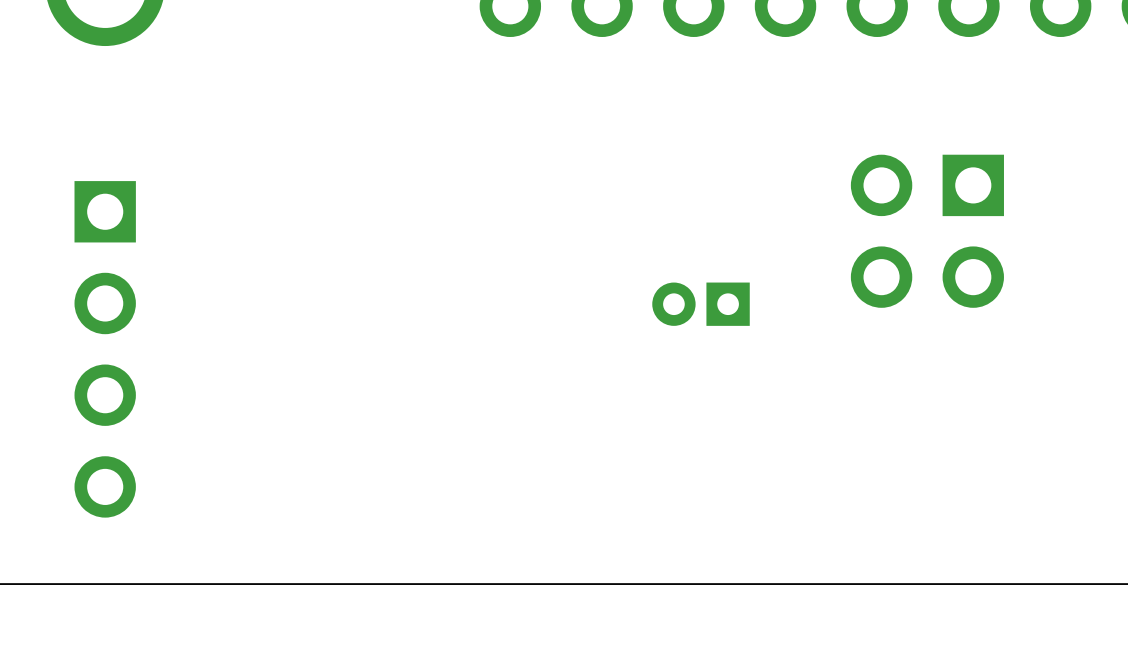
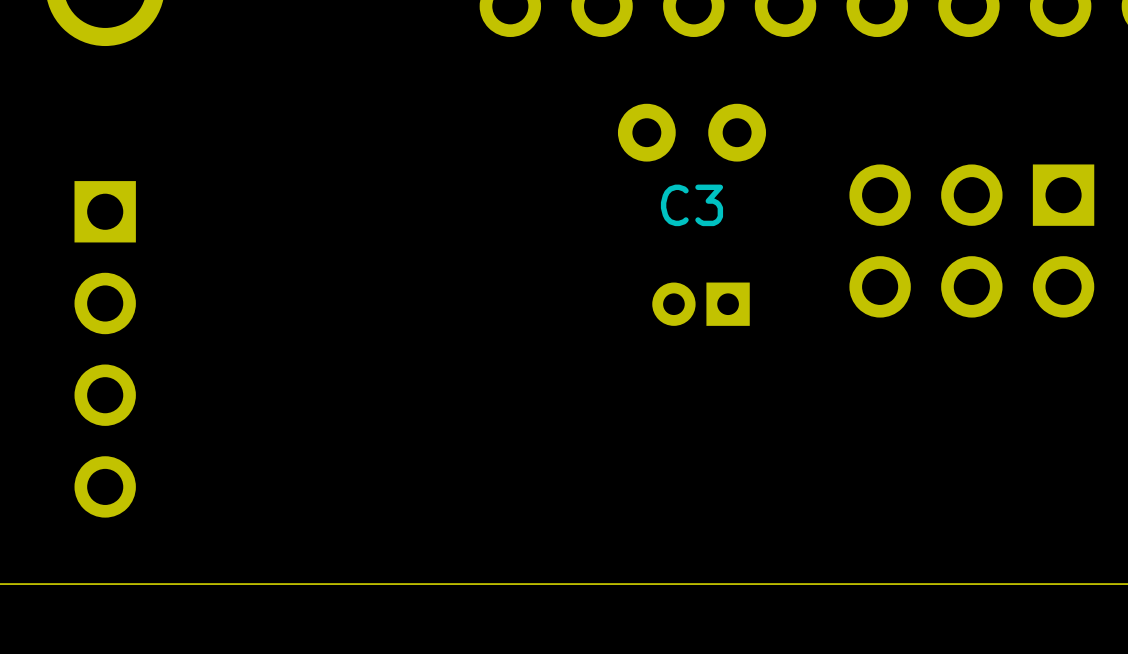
C3: none -> (691, 132)
part: (927, 231) -> none
part: none -> (971, 241)

